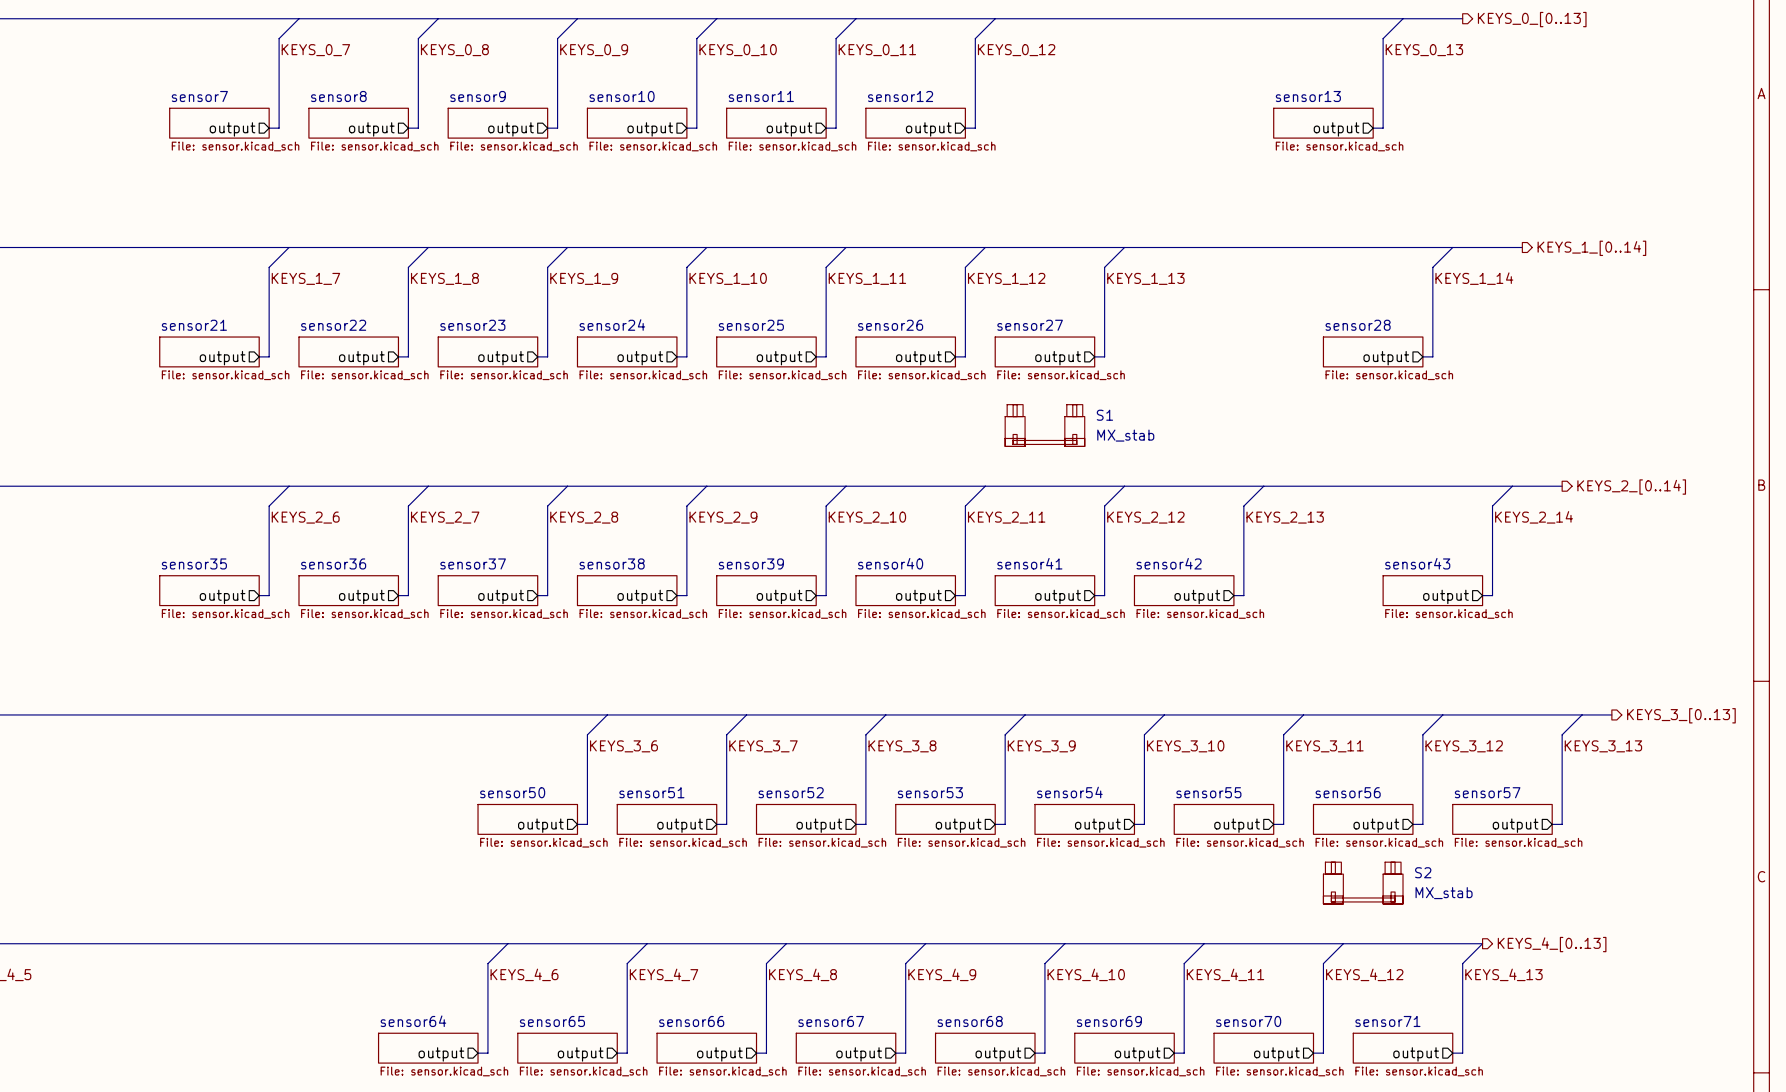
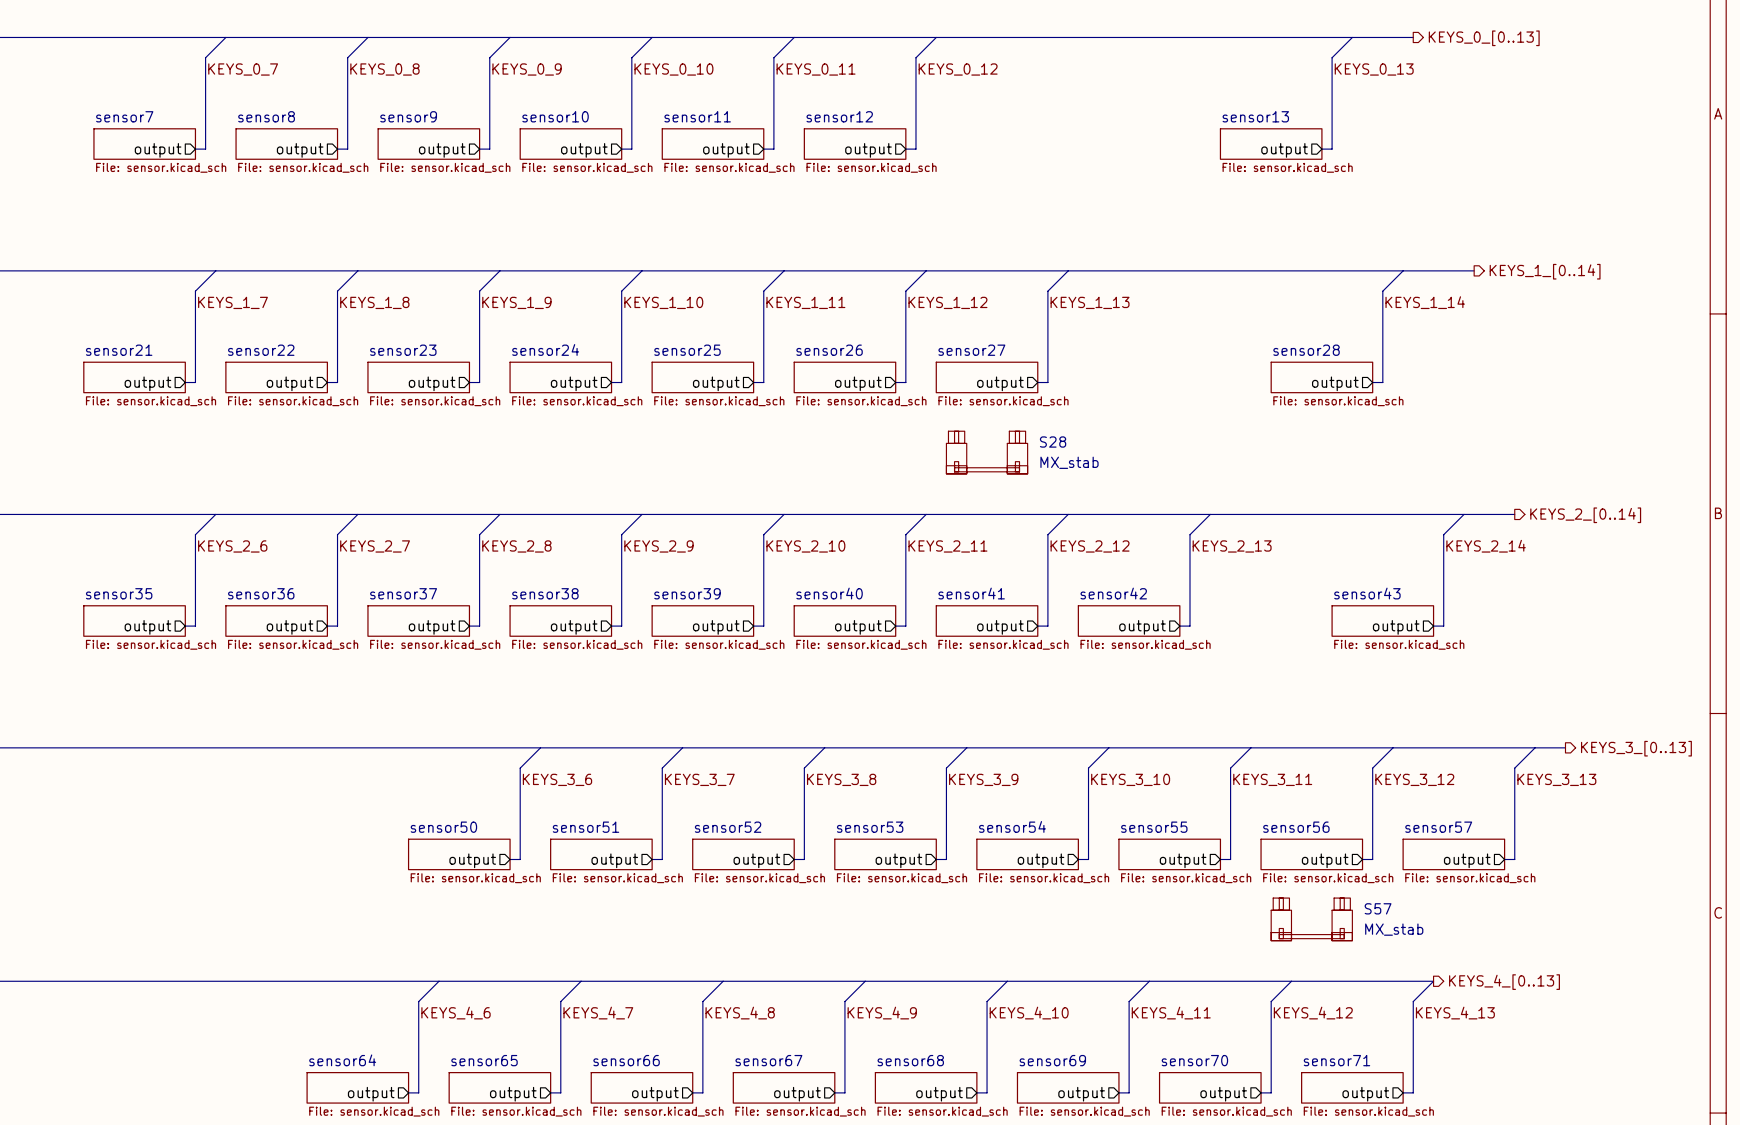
S1 name: S1 (1104, 415) -> S28 (1053, 442)
S2 name: S2 (1423, 872) -> S57 (1378, 908)

